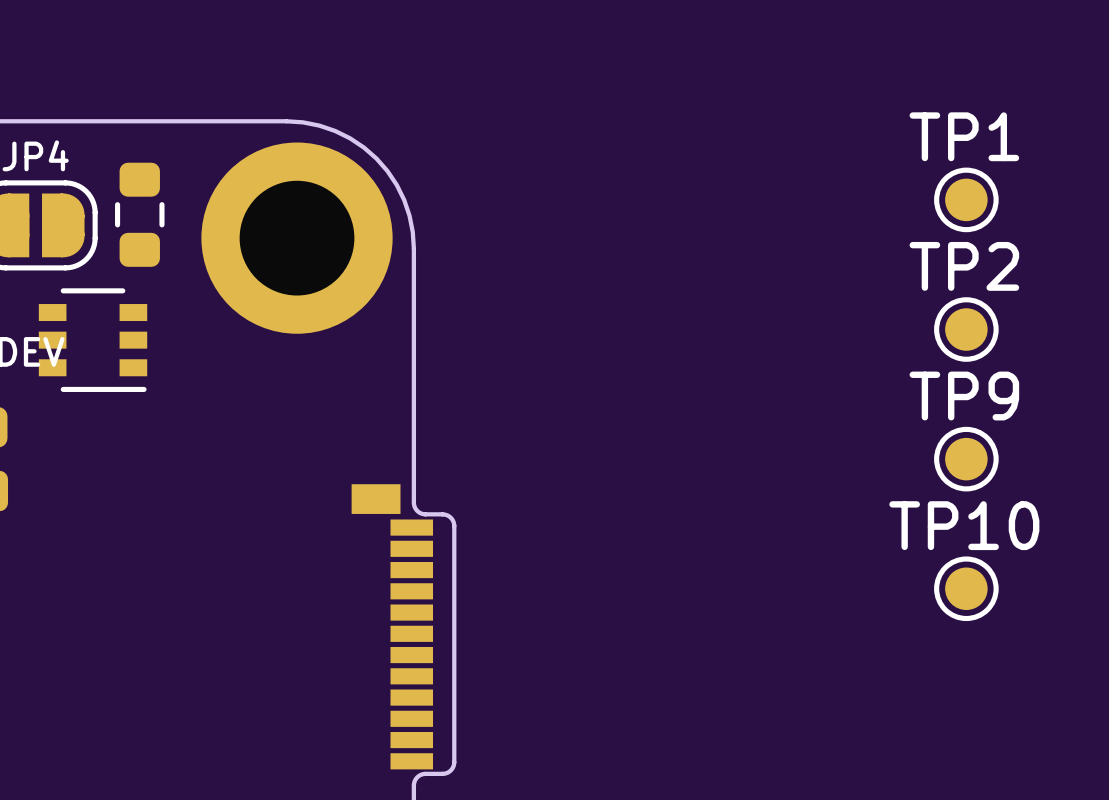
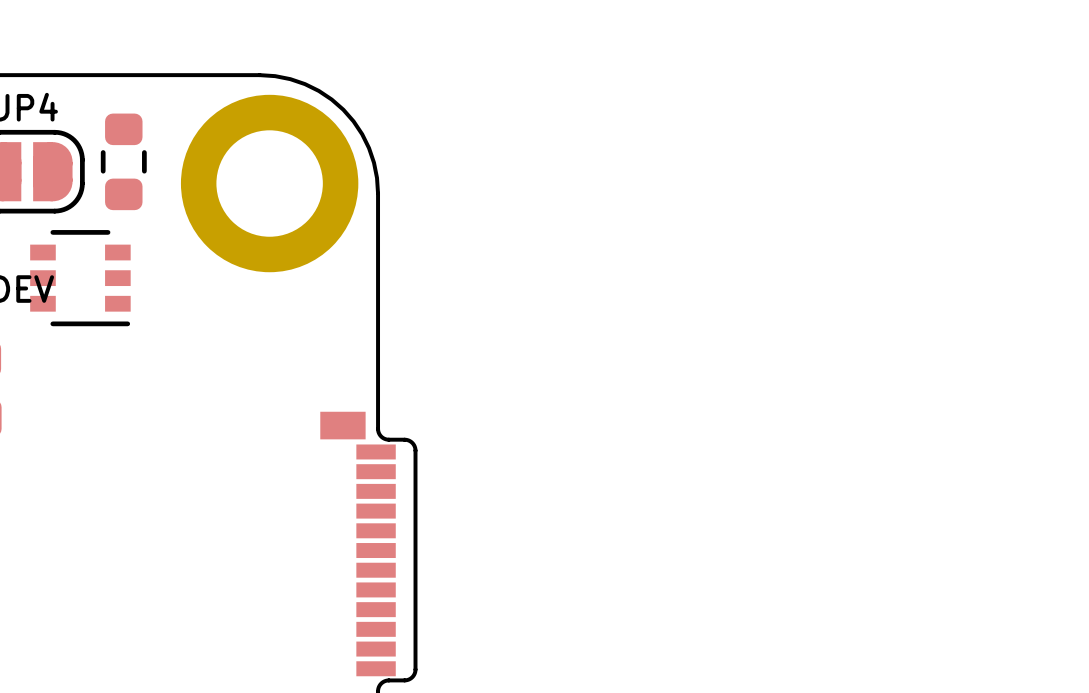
TP1: (966, 199) -> none
TP2: (966, 329) -> none
TP9: (966, 459) -> none
TP10: (966, 588) -> none

